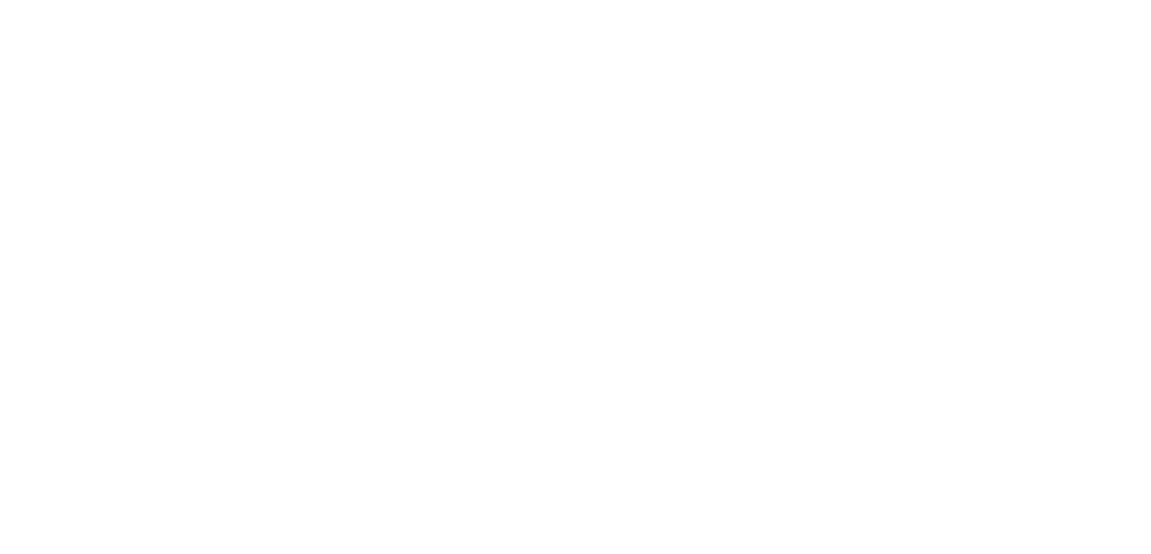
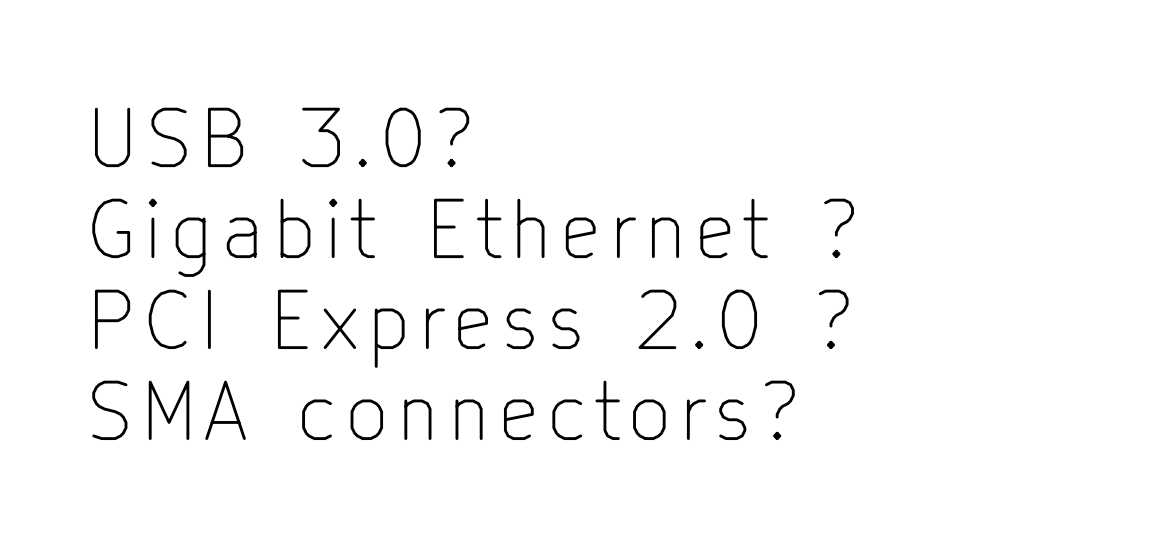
text: none -> USB 3.0? (282, 137)
text: none -> Gigabit Ethernet ? (473, 237)
text: none -> PCI Express 2.0 ? (471, 328)
text: none -> SMA connectors? (443, 410)

